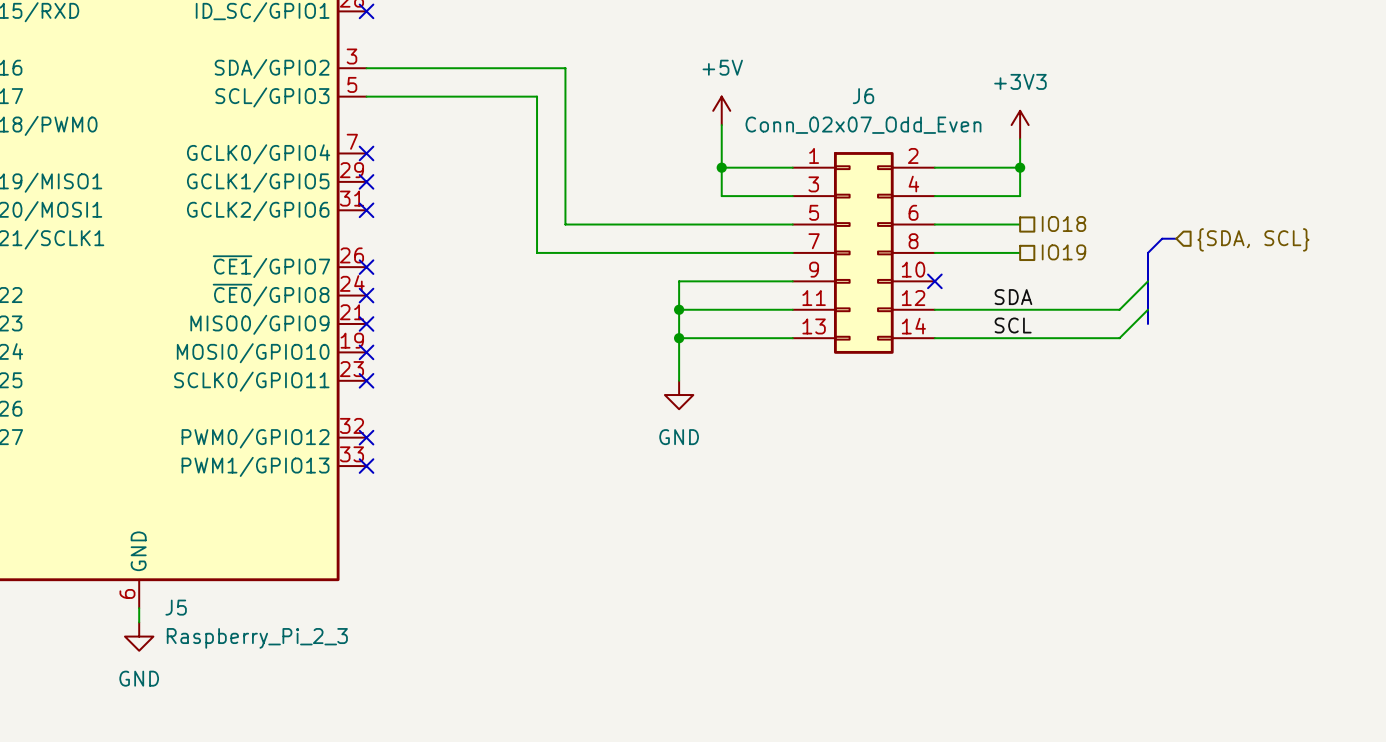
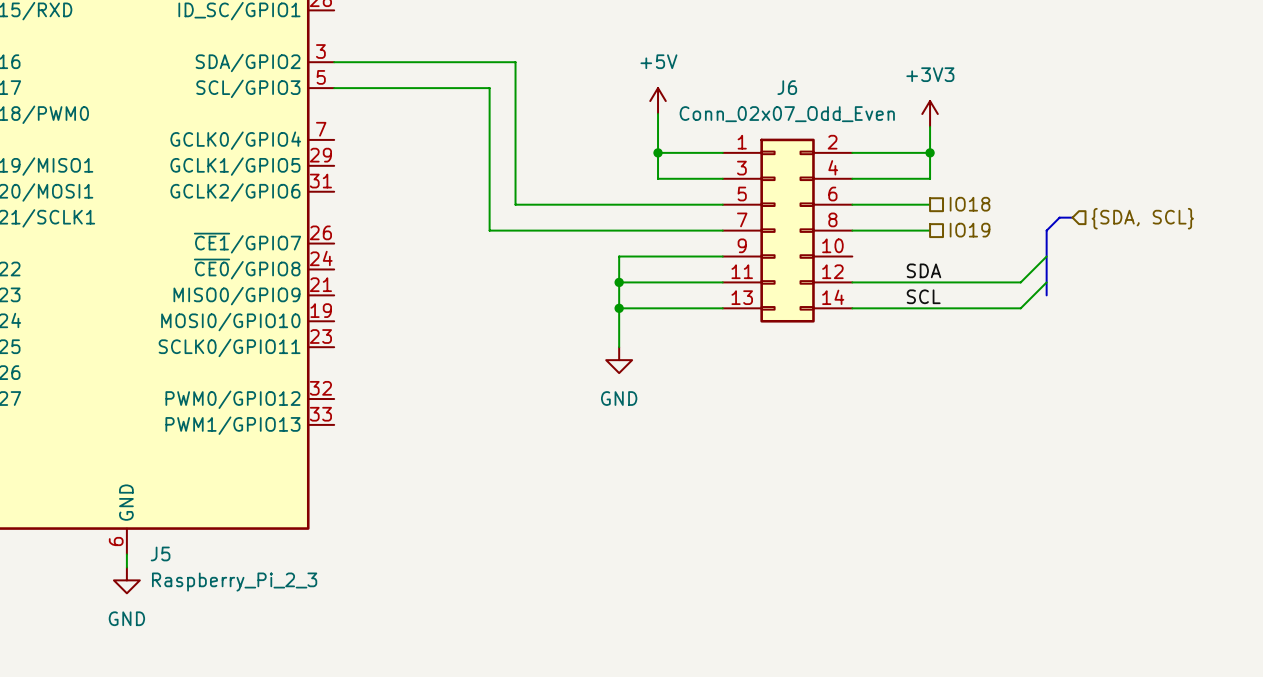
no-connect mark: (366, 11) -> none
no-connect mark: (366, 153) -> none
no-connect mark: (366, 181) -> none
no-connect mark: (366, 210) -> none
no-connect mark: (366, 267) -> none
no-connect mark: (934, 281) -> none
no-connect mark: (366, 295) -> none
no-connect mark: (366, 323) -> none
no-connect mark: (366, 352) -> none
no-connect mark: (366, 380) -> none
no-connect mark: (366, 437) -> none
no-connect mark: (366, 466) -> none

